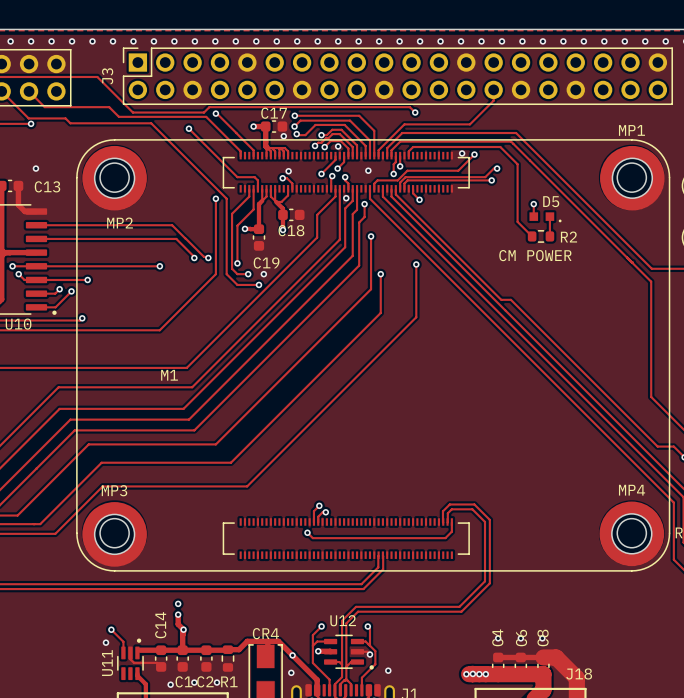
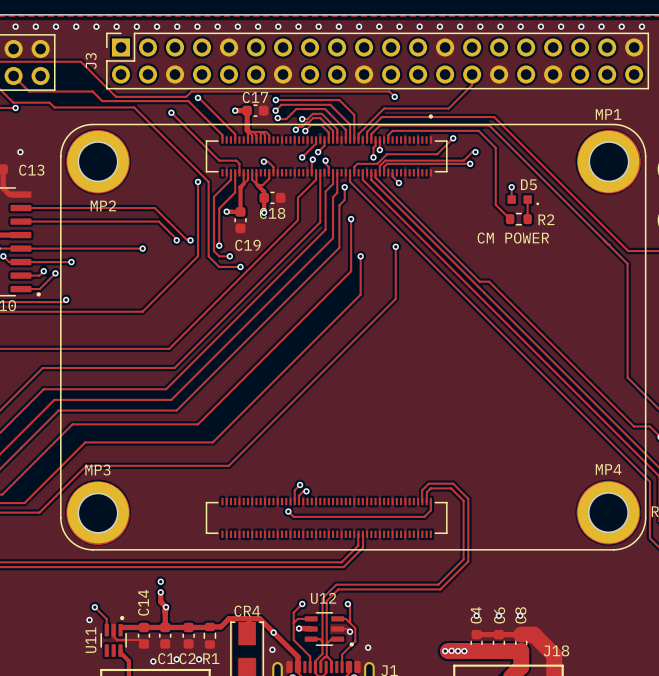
via: (283, 136) -> none
via: (338, 146) -> none
via: (462, 153) -> none
via: (368, 170) -> none
via: (288, 171) -> none
via: (346, 198) -> none
via: (263, 274) -> none
part: none -> (353, 332)
M1: (373, 355) -> none

